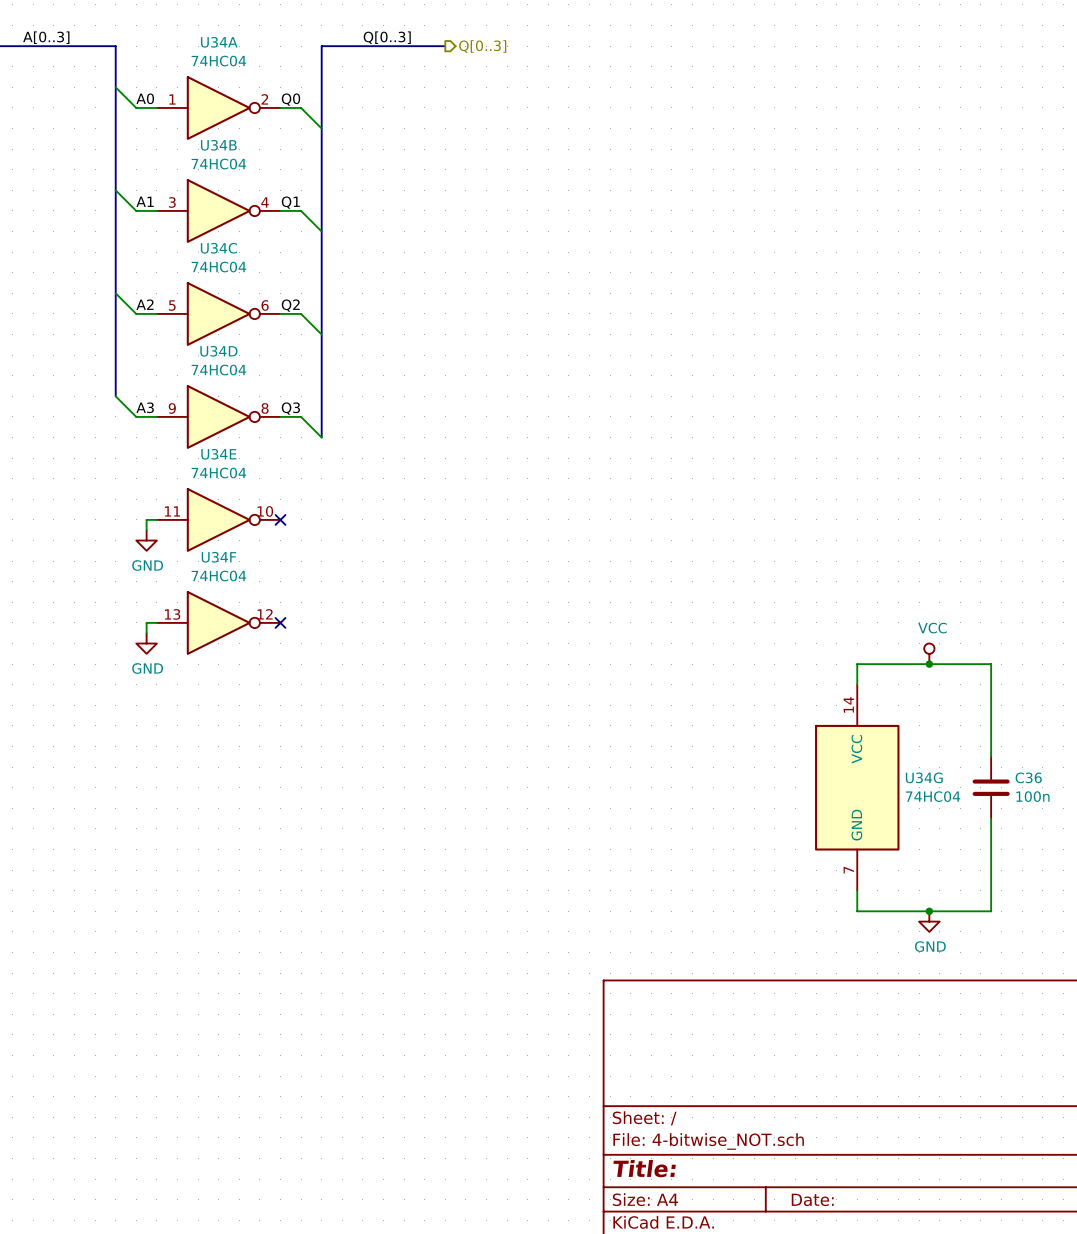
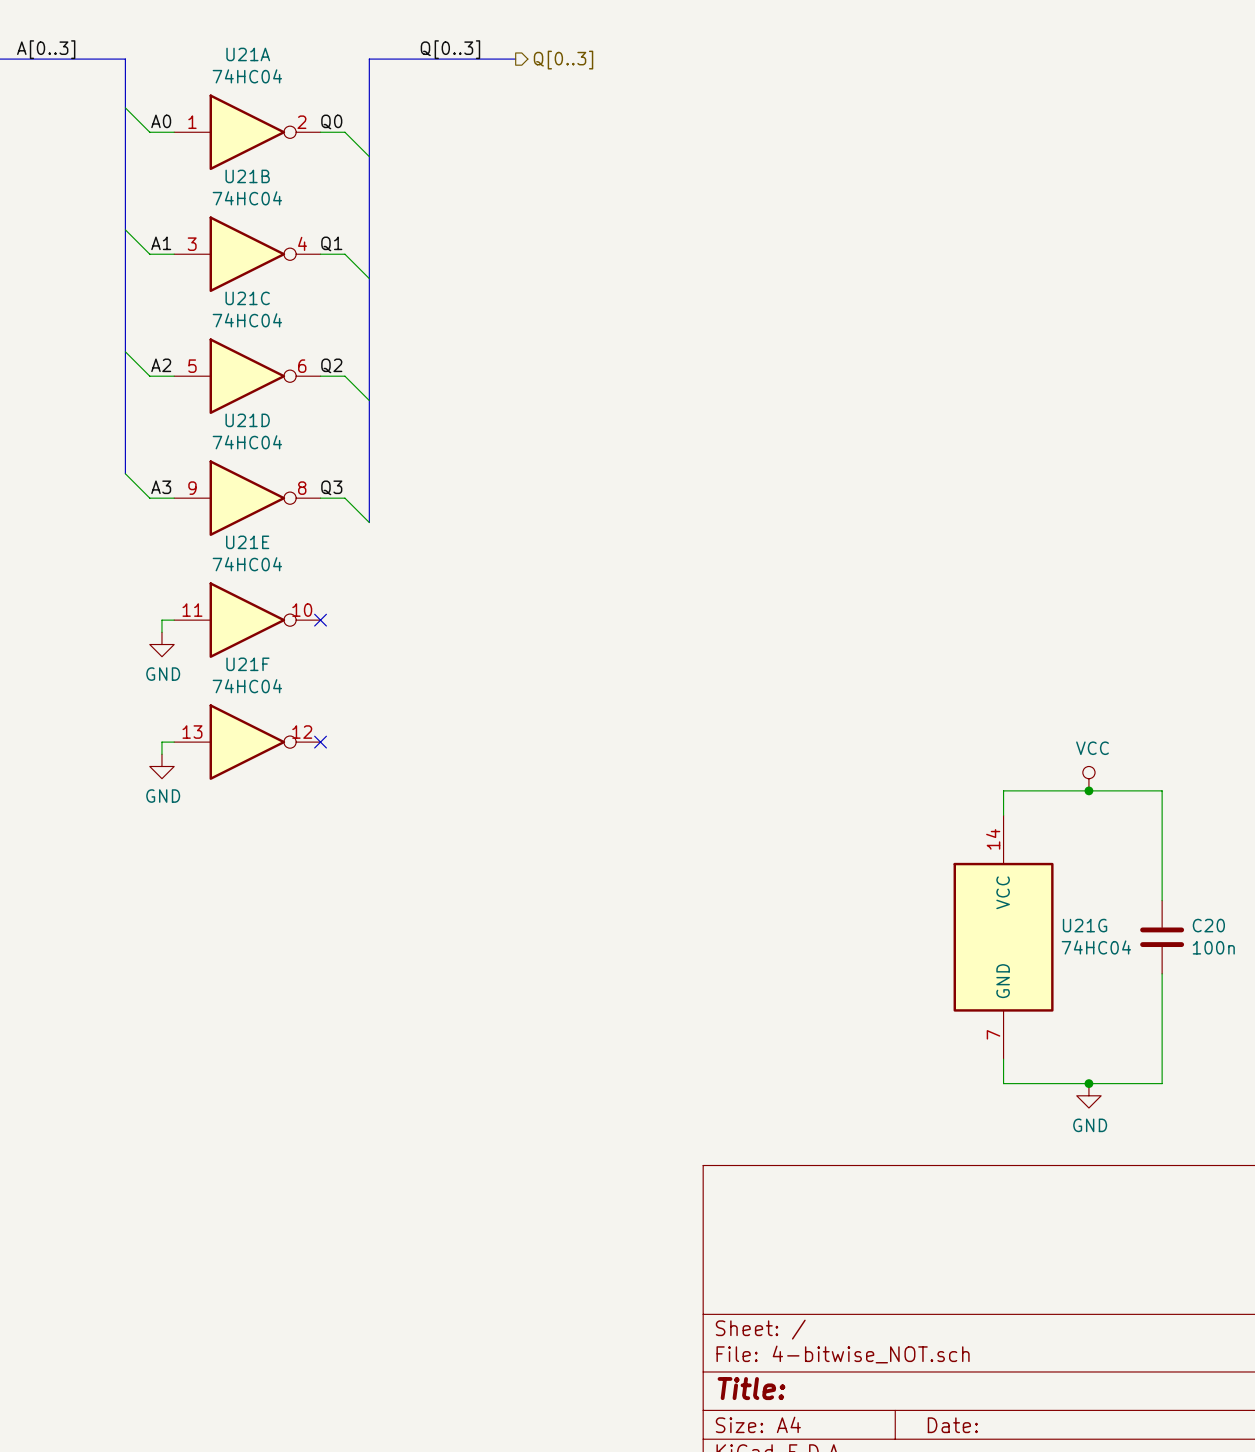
U34A name: U34A (219, 42) -> U21A (248, 54)
U34B name: U34B (218, 145) -> U21B (247, 176)
U34C name: U34C (218, 248) -> U21C (247, 298)
U34D name: U34D (218, 351) -> U21D (247, 420)
U34E name: U34E (218, 454) -> U21E (247, 542)
U34F name: U34F (218, 557) -> U21F (247, 664)
U34G name: U34G (924, 777) -> U21G (1085, 925)
C36 name: C36 (1028, 777) -> C20 (1208, 925)

